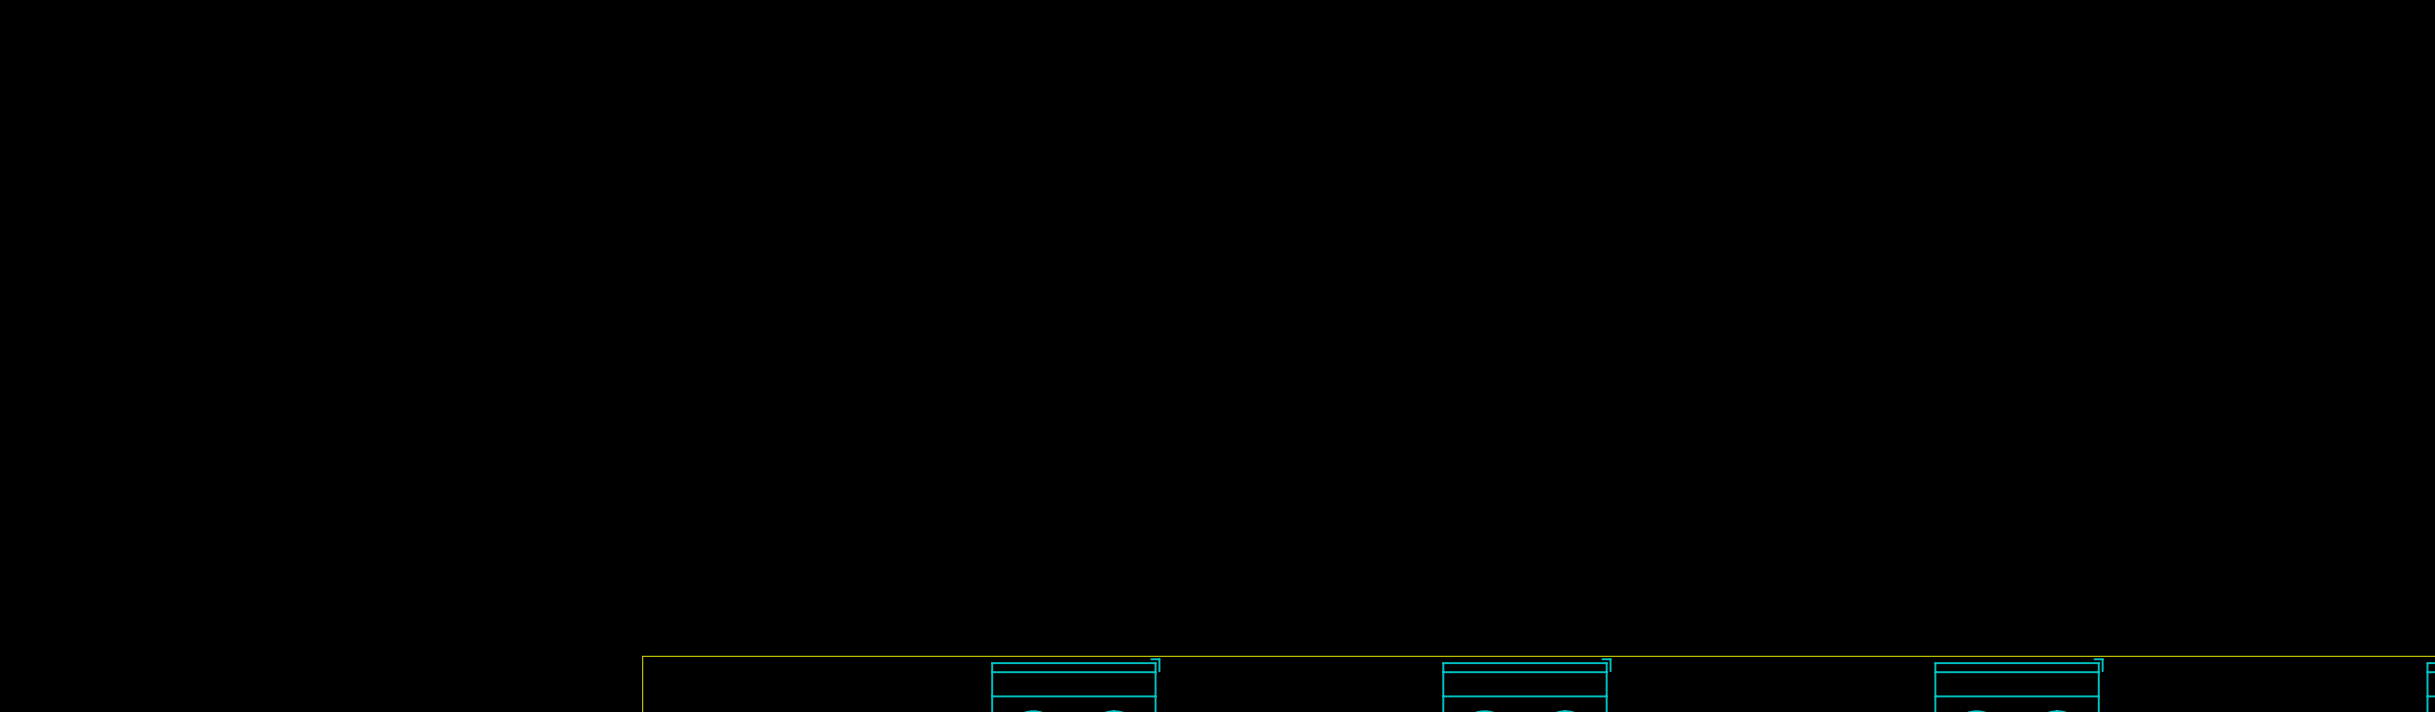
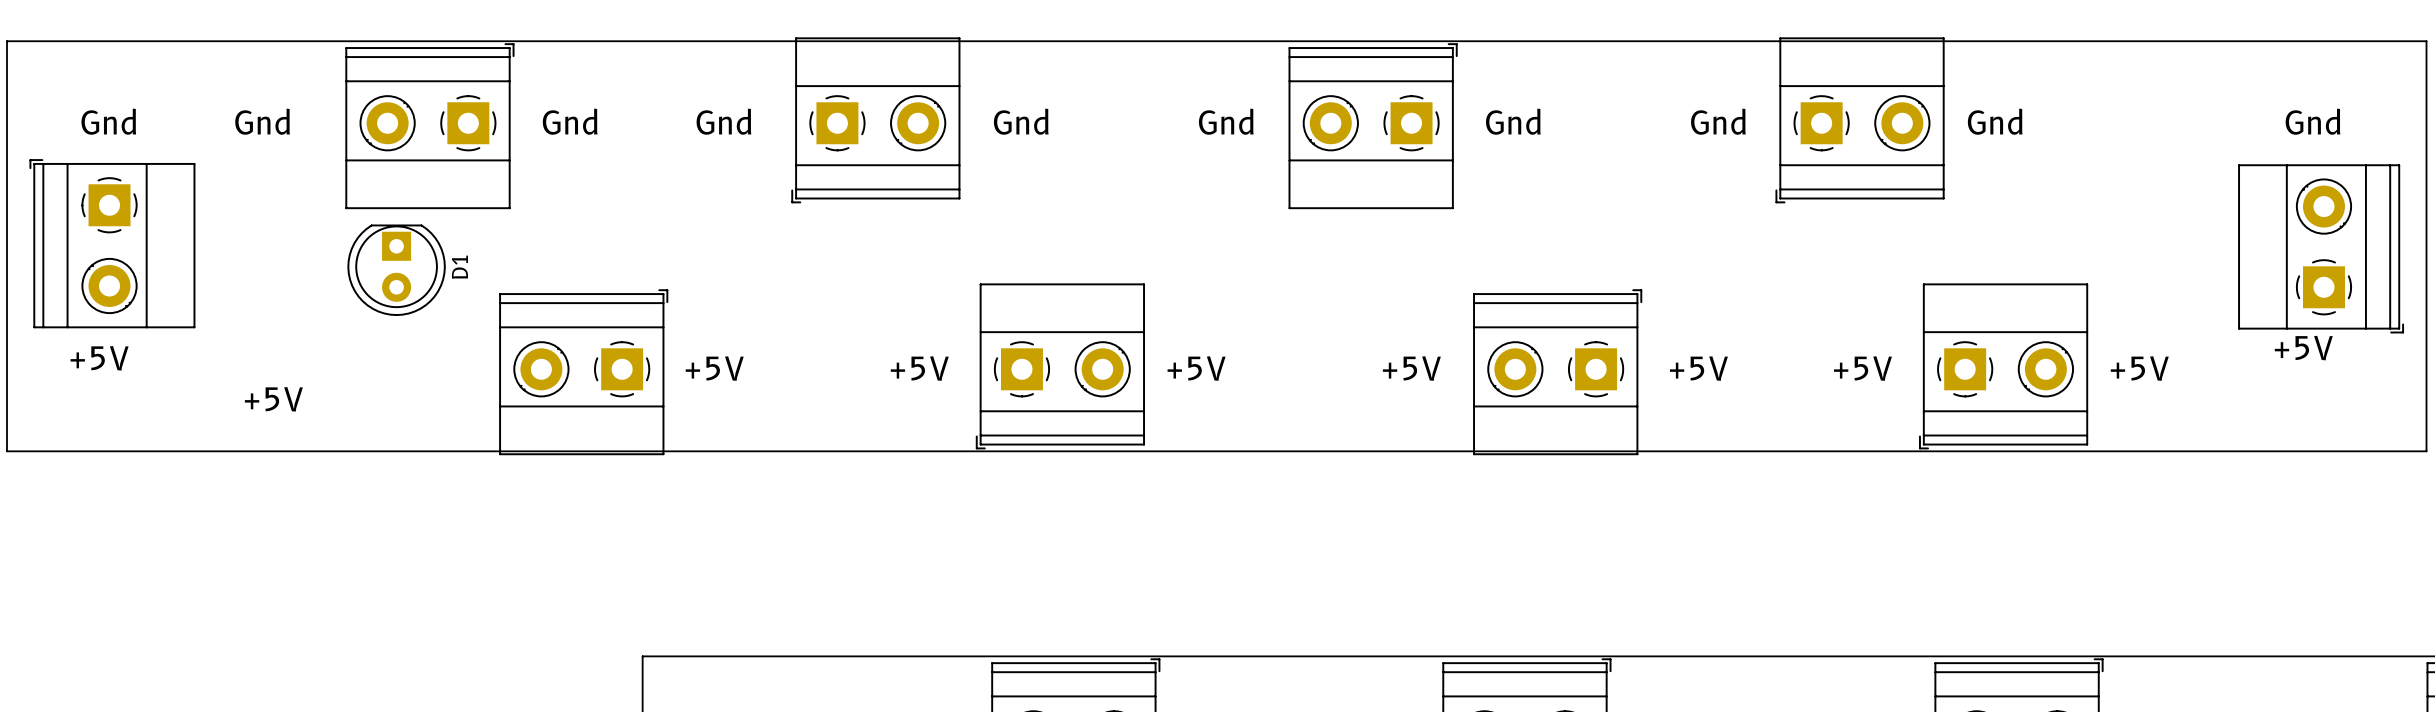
board edge: none -> (7, 41) (2426, 41) (2426, 451) (7, 451) (7, 41)
part: none -> (875, 120)
part: none -> (1860, 120)
text: none -> Gnd (108, 121)
text: none -> Gnd (262, 121)
text: none -> Gnd (570, 121)
text: none -> Gnd (723, 121)
text: none -> Gnd (1021, 121)
text: none -> Gnd (1226, 121)
text: none -> Gnd (1513, 121)
text: none -> Gnd (1718, 121)
text: none -> Gnd (1995, 121)
text: none -> Gnd (2313, 121)
part: none -> (429, 126)
part: none -> (1373, 126)
part: none -> (112, 243)
part: none -> (2321, 248)
D1: none -> (396, 270)
text: none -> +5V (2303, 348)
text: none -> +5V (99, 358)
part: none -> (1060, 366)
part: none -> (2003, 366)
text: none -> +5V (714, 368)
text: none -> +5V (919, 368)
text: none -> +5V (1196, 368)
text: none -> +5V (1411, 368)
text: none -> +5V (1698, 368)
text: none -> +5V (1862, 368)
text: none -> +5V (2139, 368)
part: none -> (583, 372)
part: none -> (1557, 372)
text: none -> +5V (273, 399)

